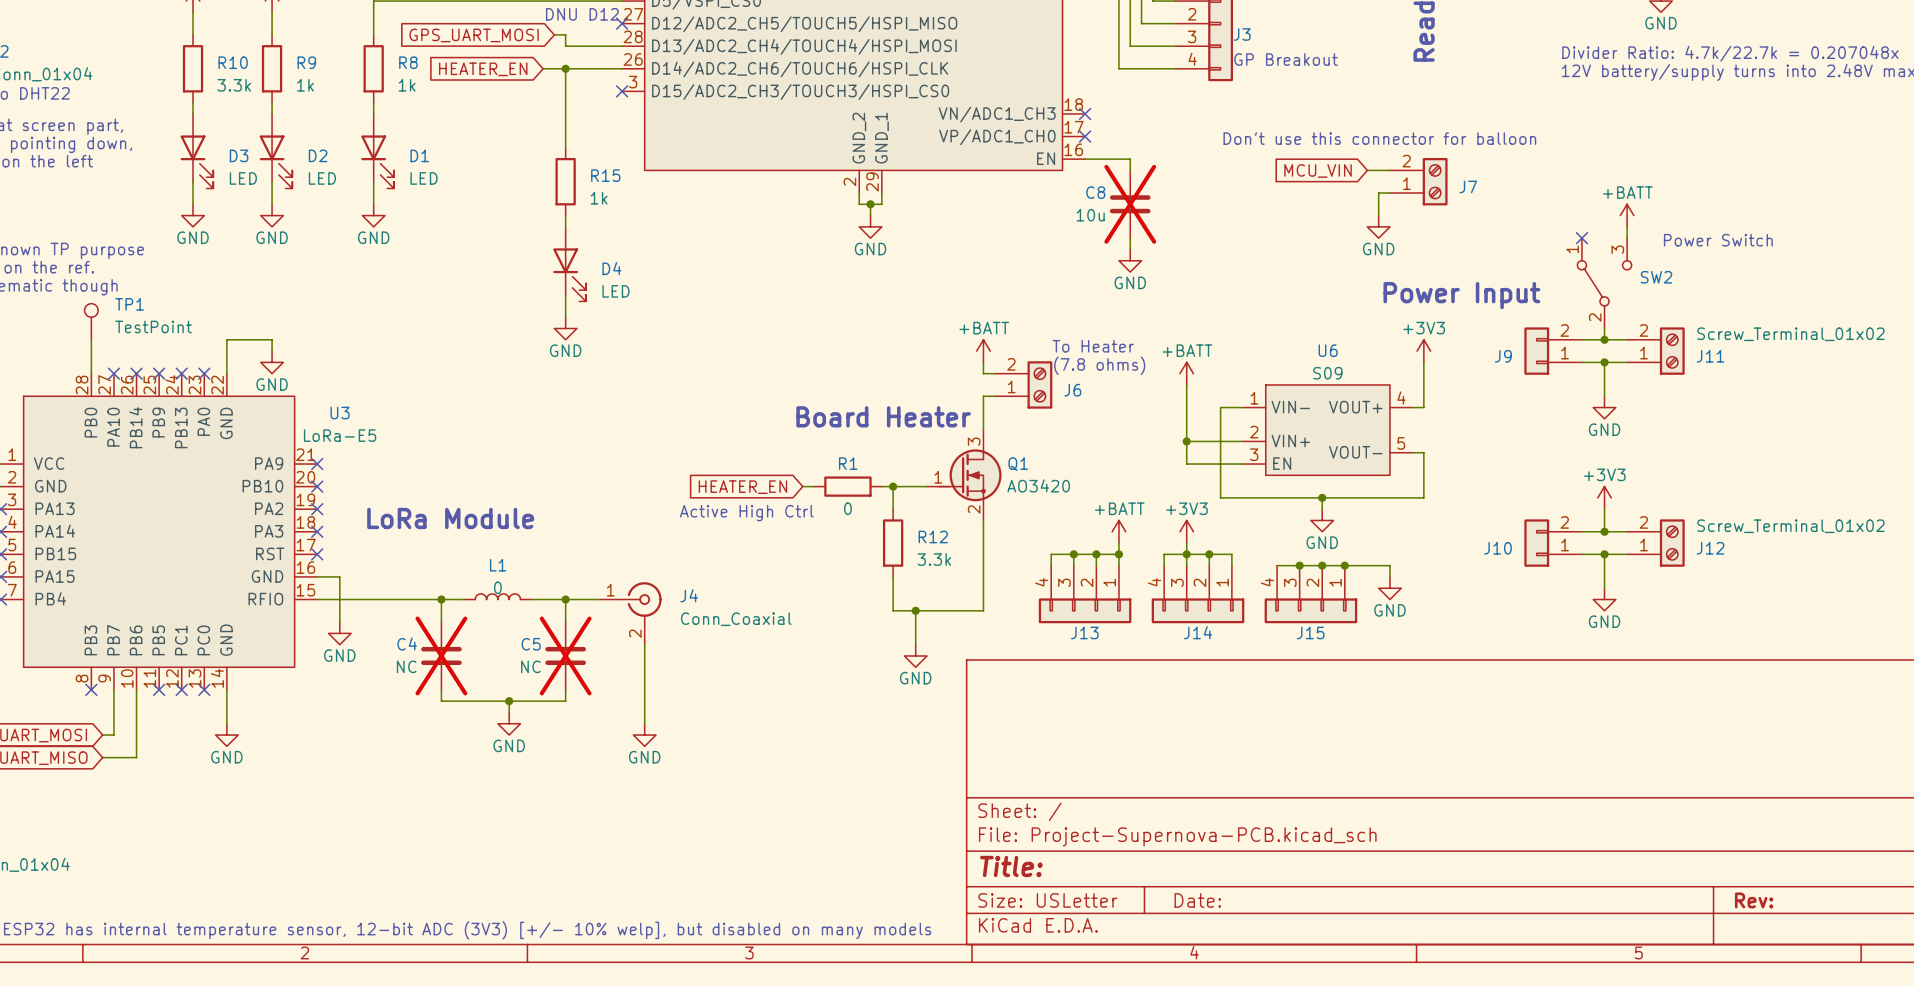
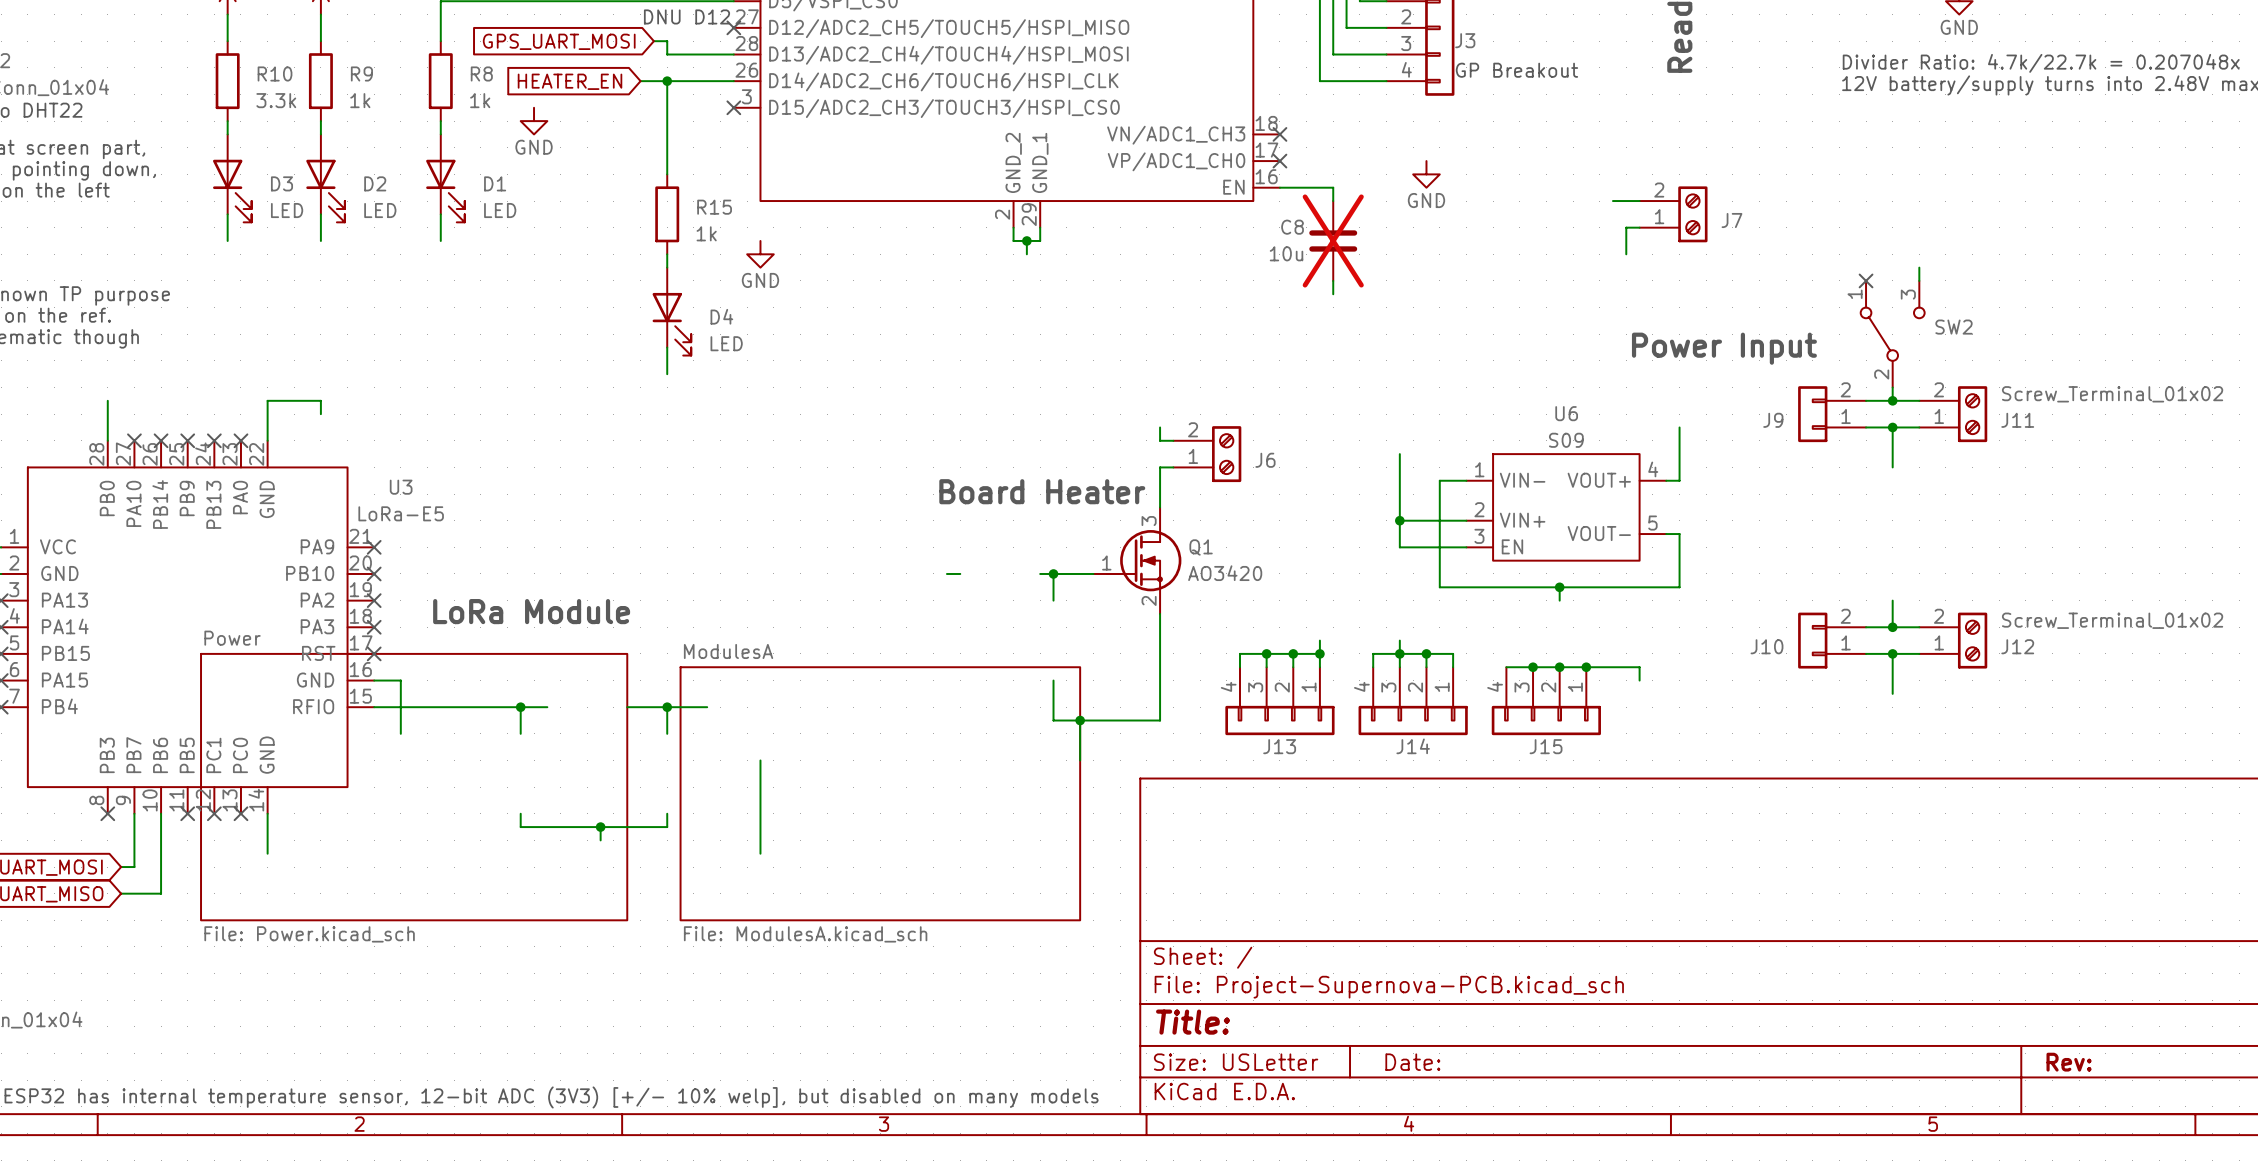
power symbol: none -> GND (534, 121)
text: Don't use this connector for balloon (1379, 138) -> none
power symbol: none -> GND (1426, 174)
global label: MCU_VIN (1318, 170) -> none
power symbol: GND (193, 215) -> none
power symbol: GND (272, 215) -> none
power symbol: GND (373, 215) -> none
power symbol: none -> GND (760, 254)
power symbol: +BATT (1627, 215) -> none
power symbol: GND (870, 226) -> none
power symbol: GND (1378, 226) -> none
text: Power Switch (1718, 240) -> none
power symbol: GND (1130, 260) -> none
TP1: TestPoint (91, 321) -> none
power symbol: GND (565, 328) -> none
text: To Heater (1093, 346) -> none
power symbol: +BATT (983, 351) -> none
power symbol: +3V3 (1423, 351) -> none
power symbol: GND (272, 362) -> none
text: (7.8 ohms) (1099, 365) -> none
power symbol: +BATT (1186, 373) -> none
power symbol: GND (1604, 407) -> none
R1: 0 (847, 486) -> none
global label: HEATER_EN (742, 487) -> none
power symbol: +3V3 (1604, 497) -> none
text: Active High Ctrl (746, 513) -> none
power symbol: GND (1322, 520) -> none
power symbol: +BATT (1118, 531) -> none
power symbol: +3V3 (1186, 531) -> none
R12: 3.3k (893, 543) -> none
power symbol: GND (1389, 588) -> none
L1: 0 (497, 596) -> none
power symbol: GND (1604, 599) -> none
J4: Conn_Coaxial (630, 613) -> none
power symbol: GND (339, 633) -> none
C4: NC (441, 655) -> none
C5: NC (565, 655) -> none
power symbol: GND (915, 655) -> none
sheet Power: none -> File: Power.kicad_sch (414, 787)
sheet ModulesA: none -> File: ModulesA.kicad_sch (880, 793)
power symbol: GND (509, 723) -> none
power symbol: GND (226, 735) -> none
power symbol: GND (644, 735) -> none

